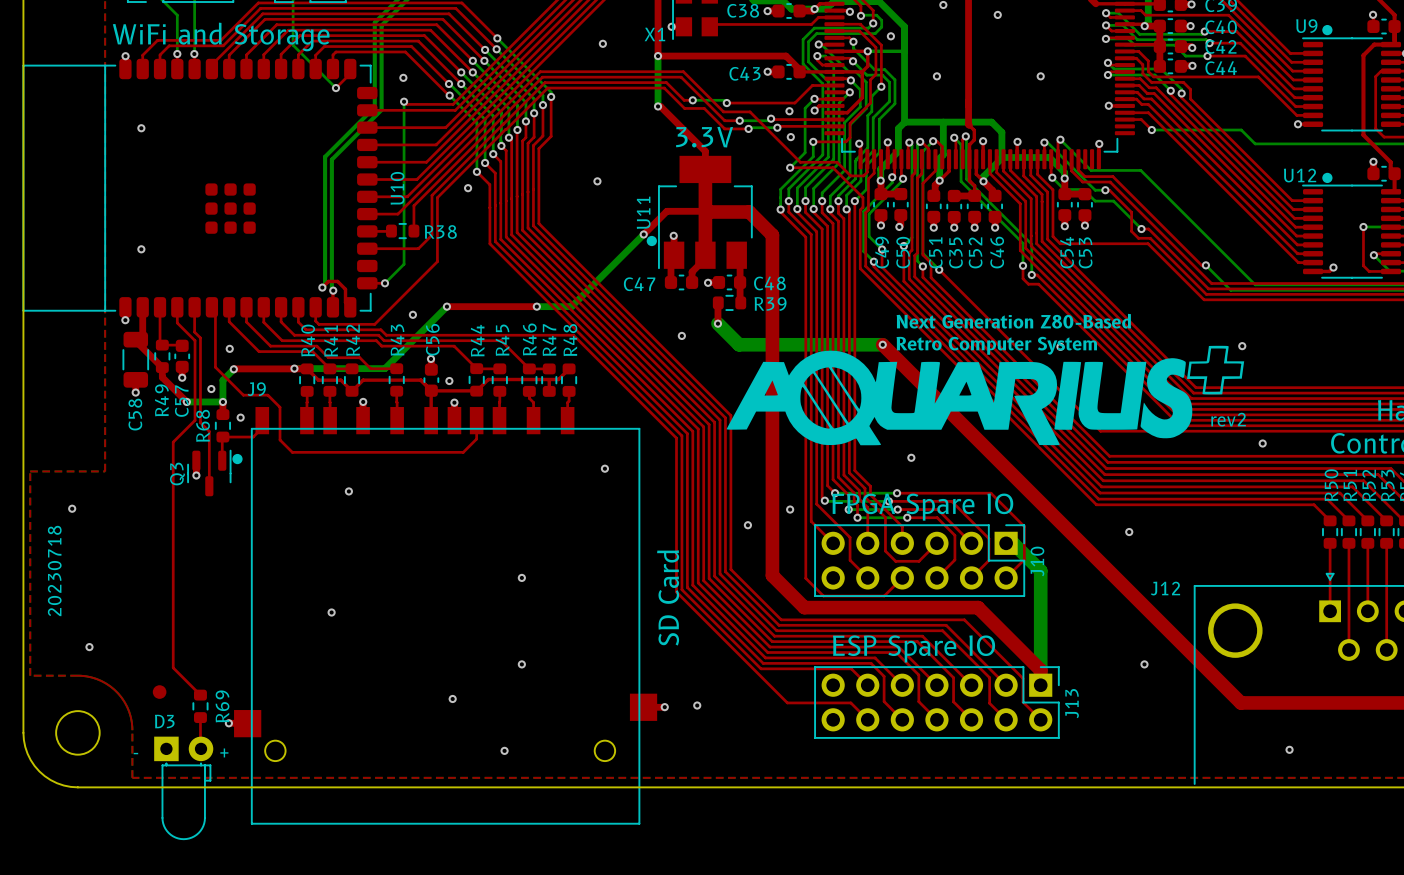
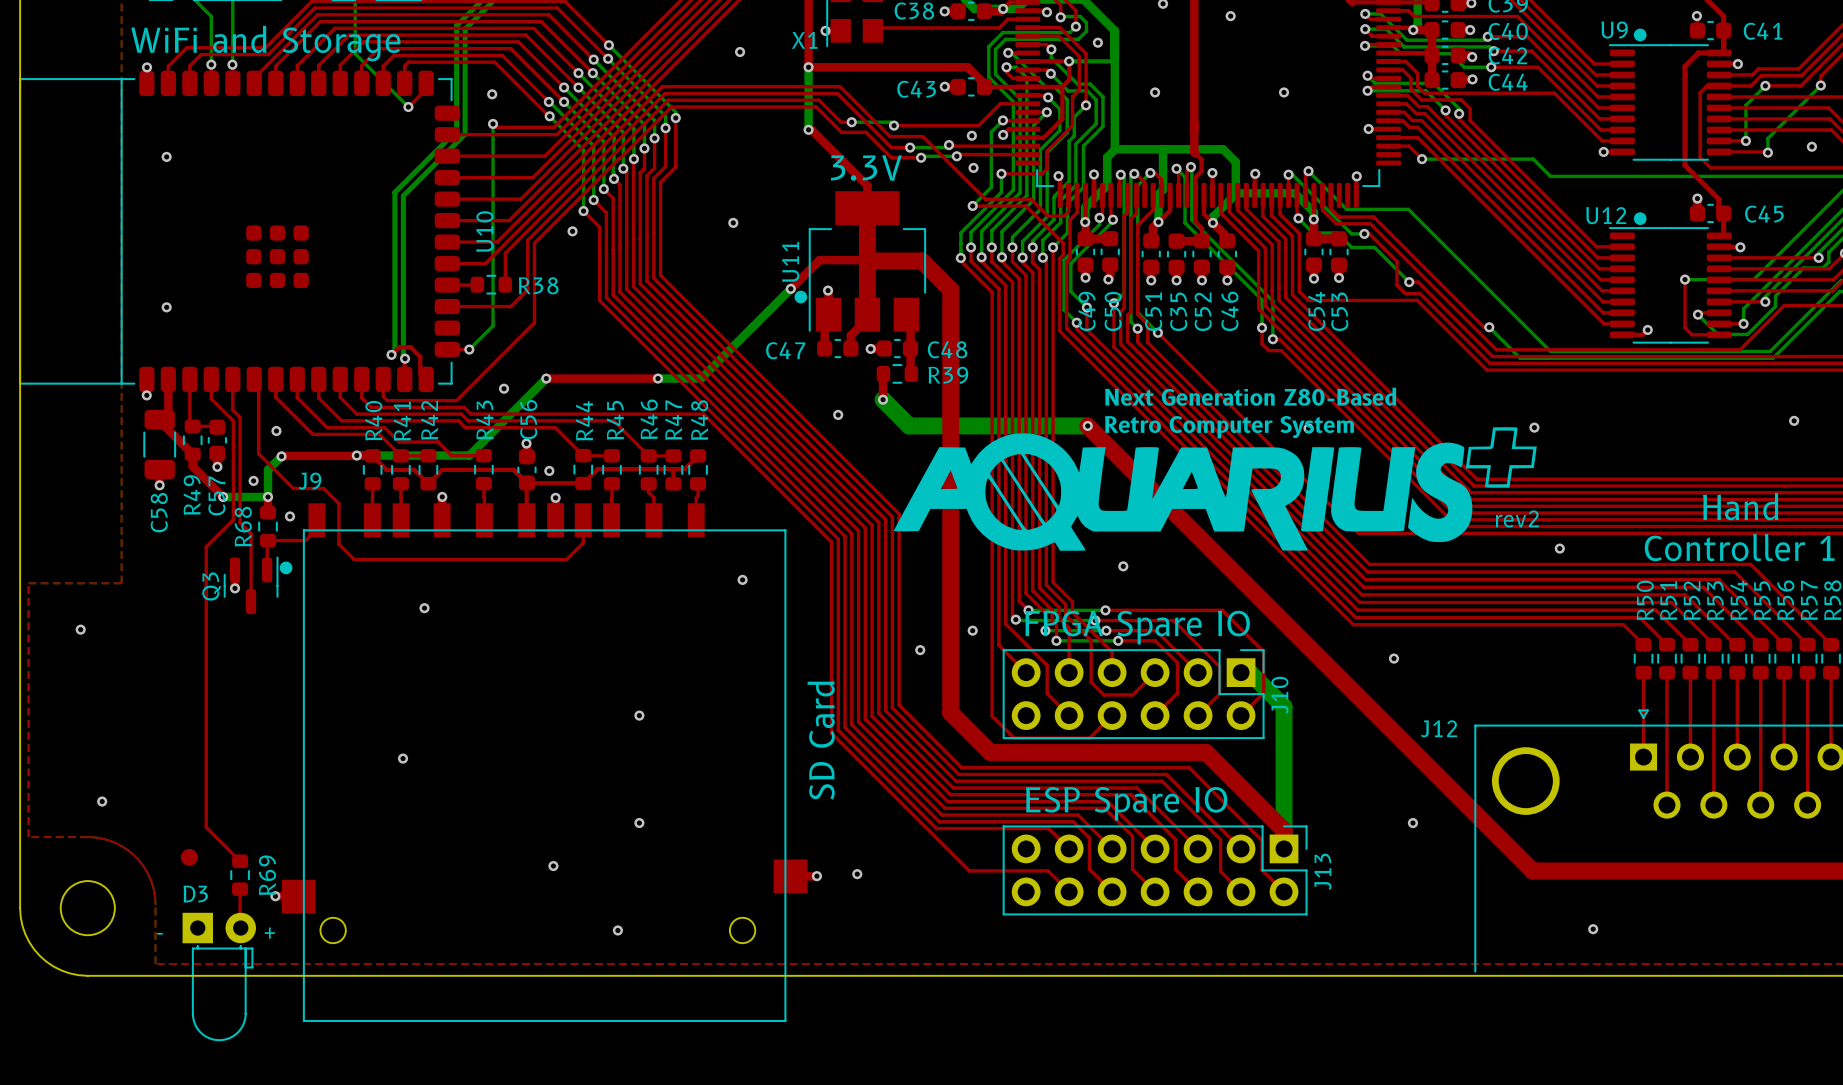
text: 20230718 (54, 570) -> none

